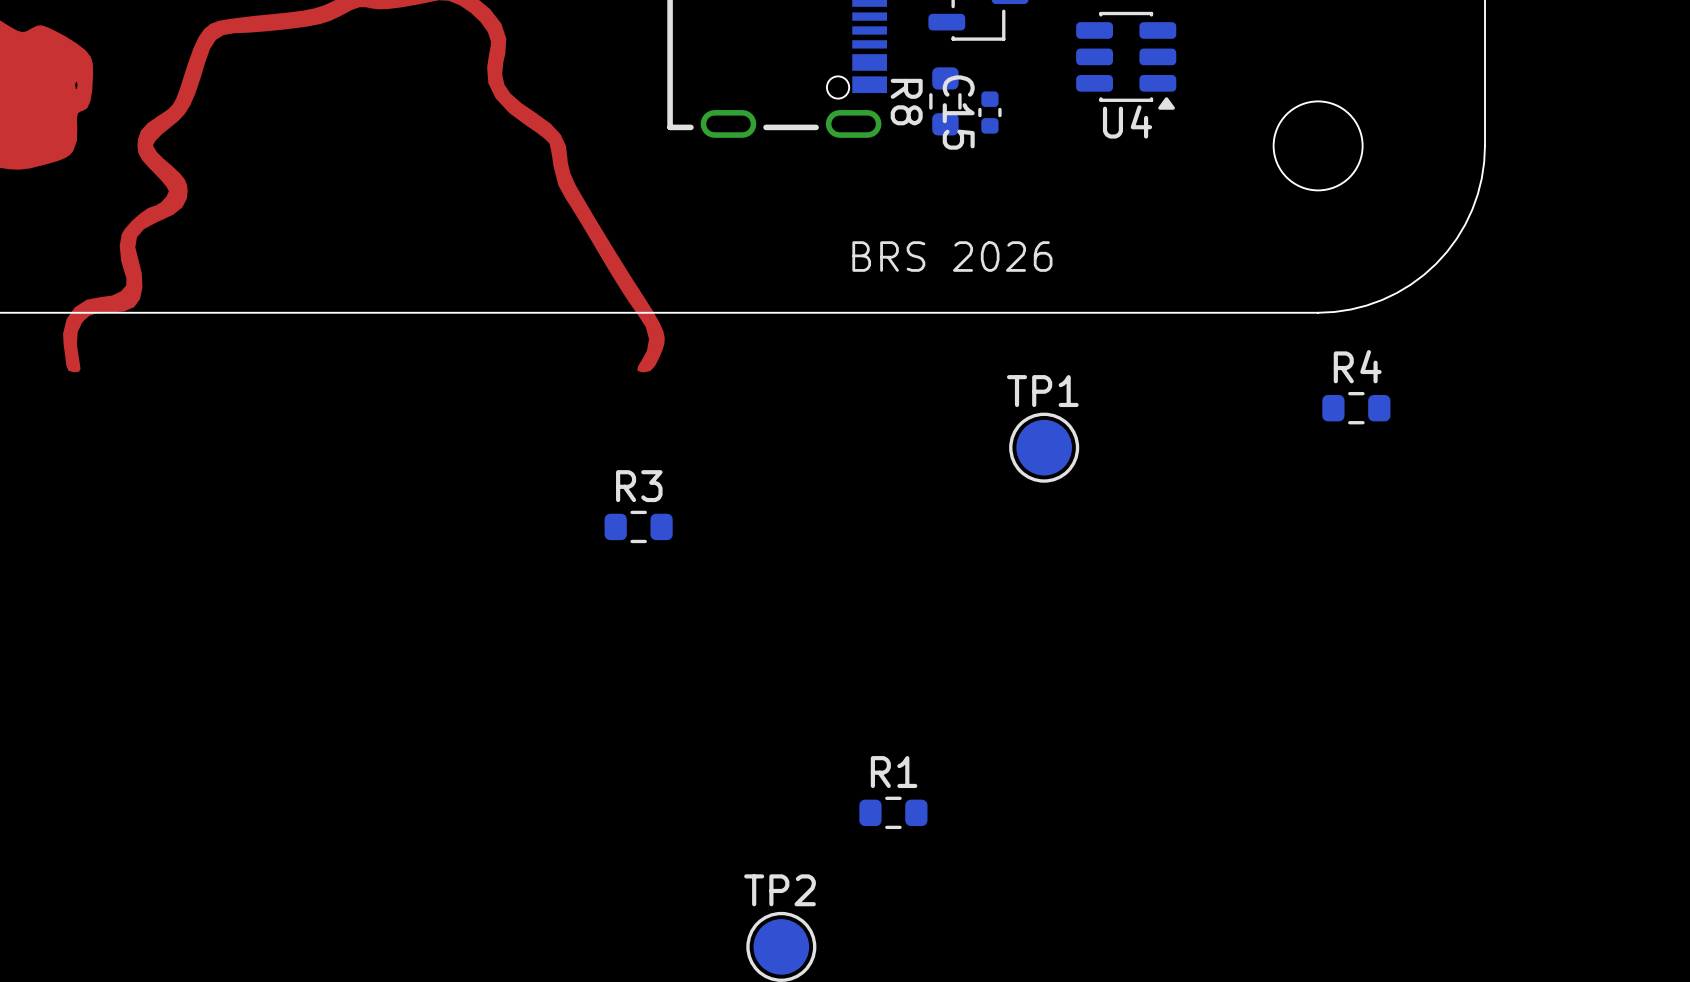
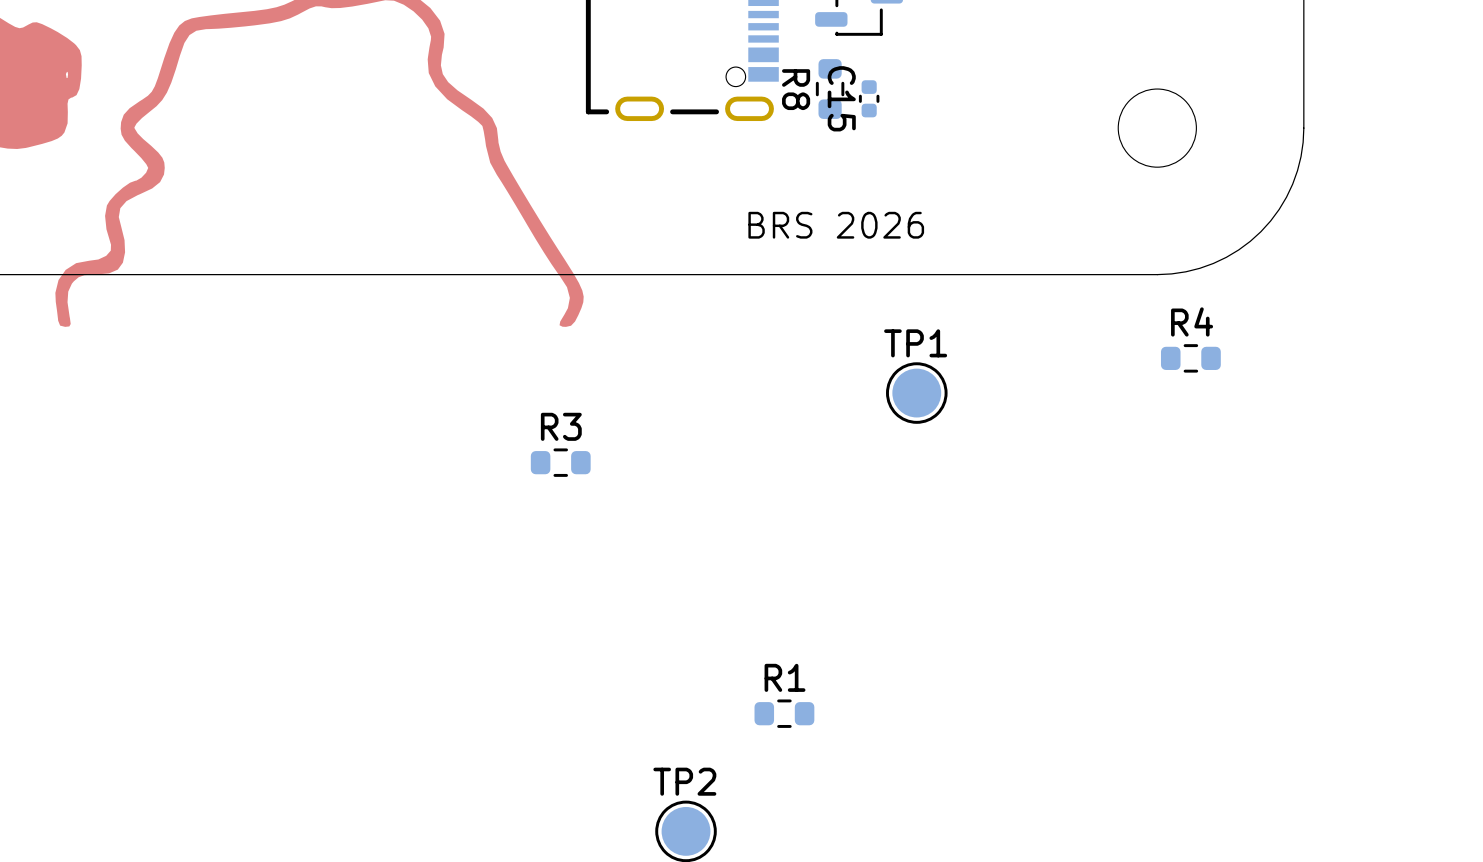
U4: (1126, 60) -> none

